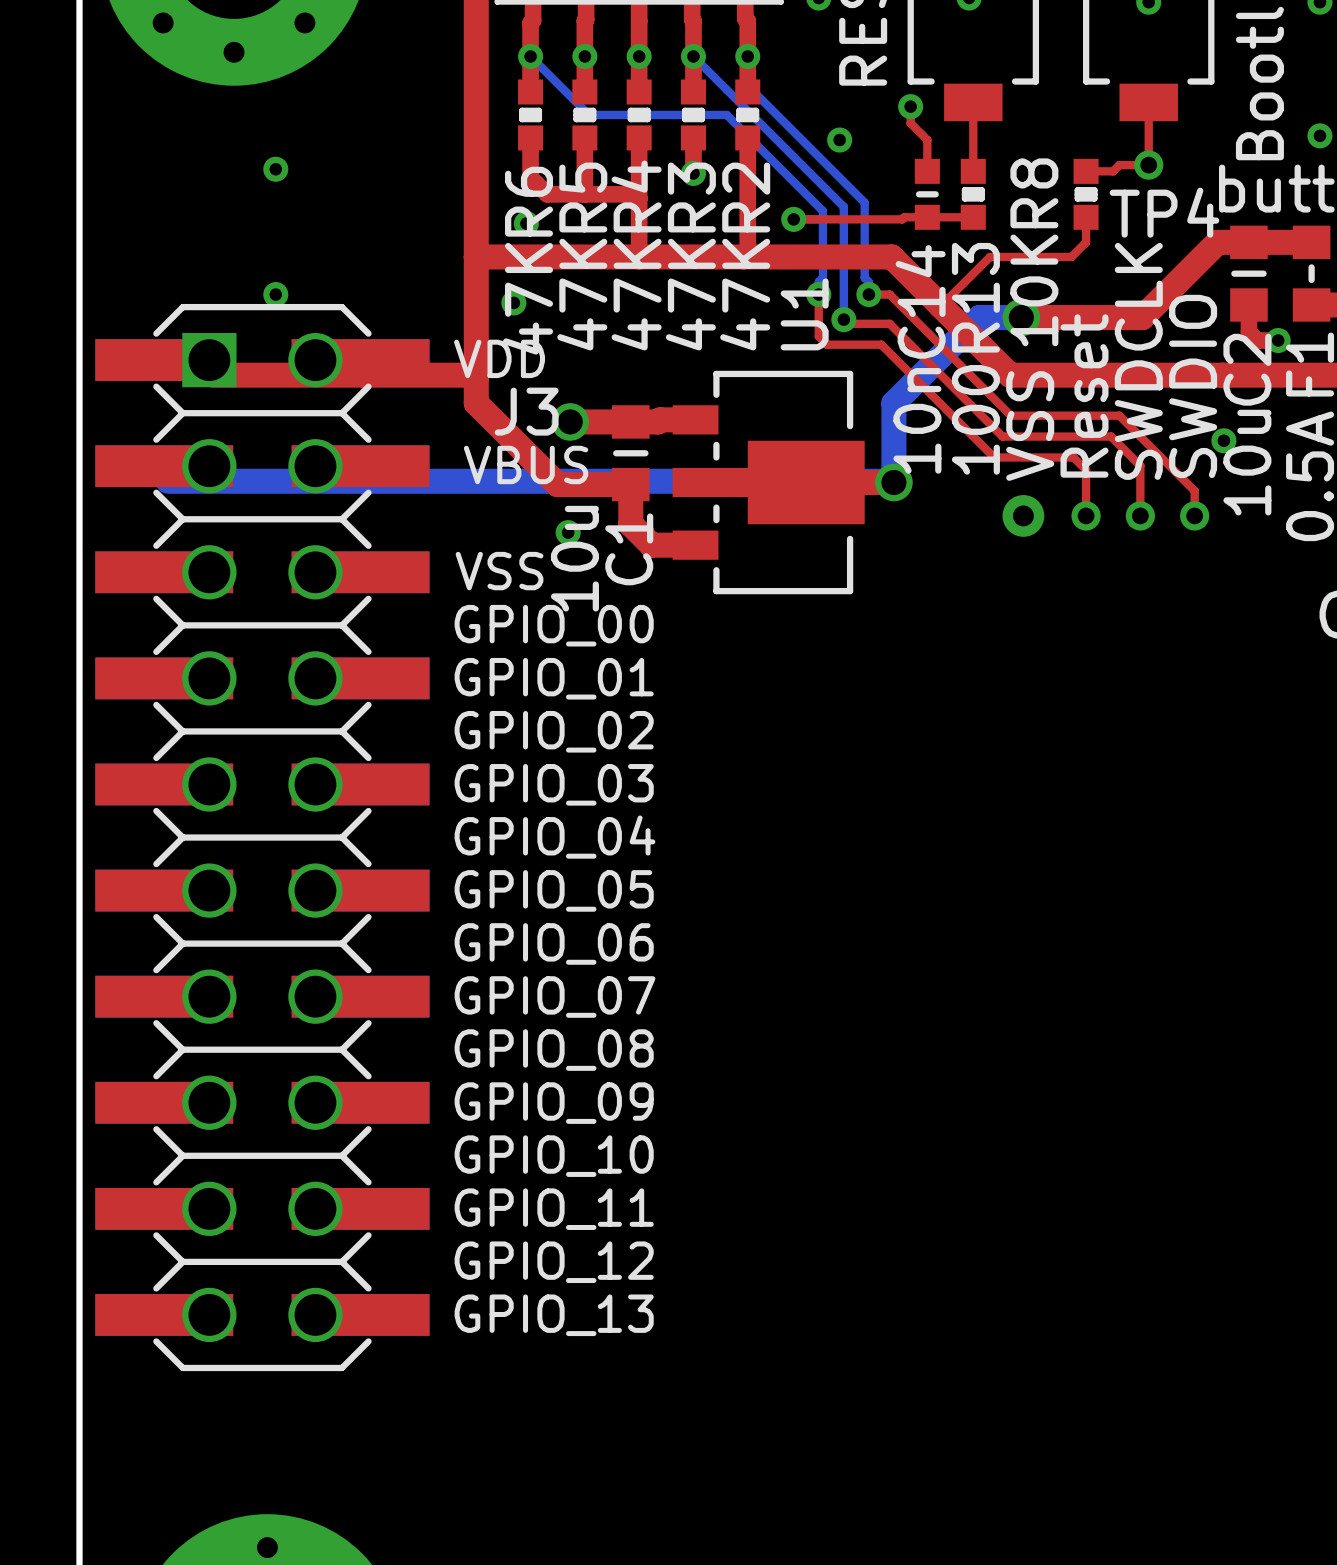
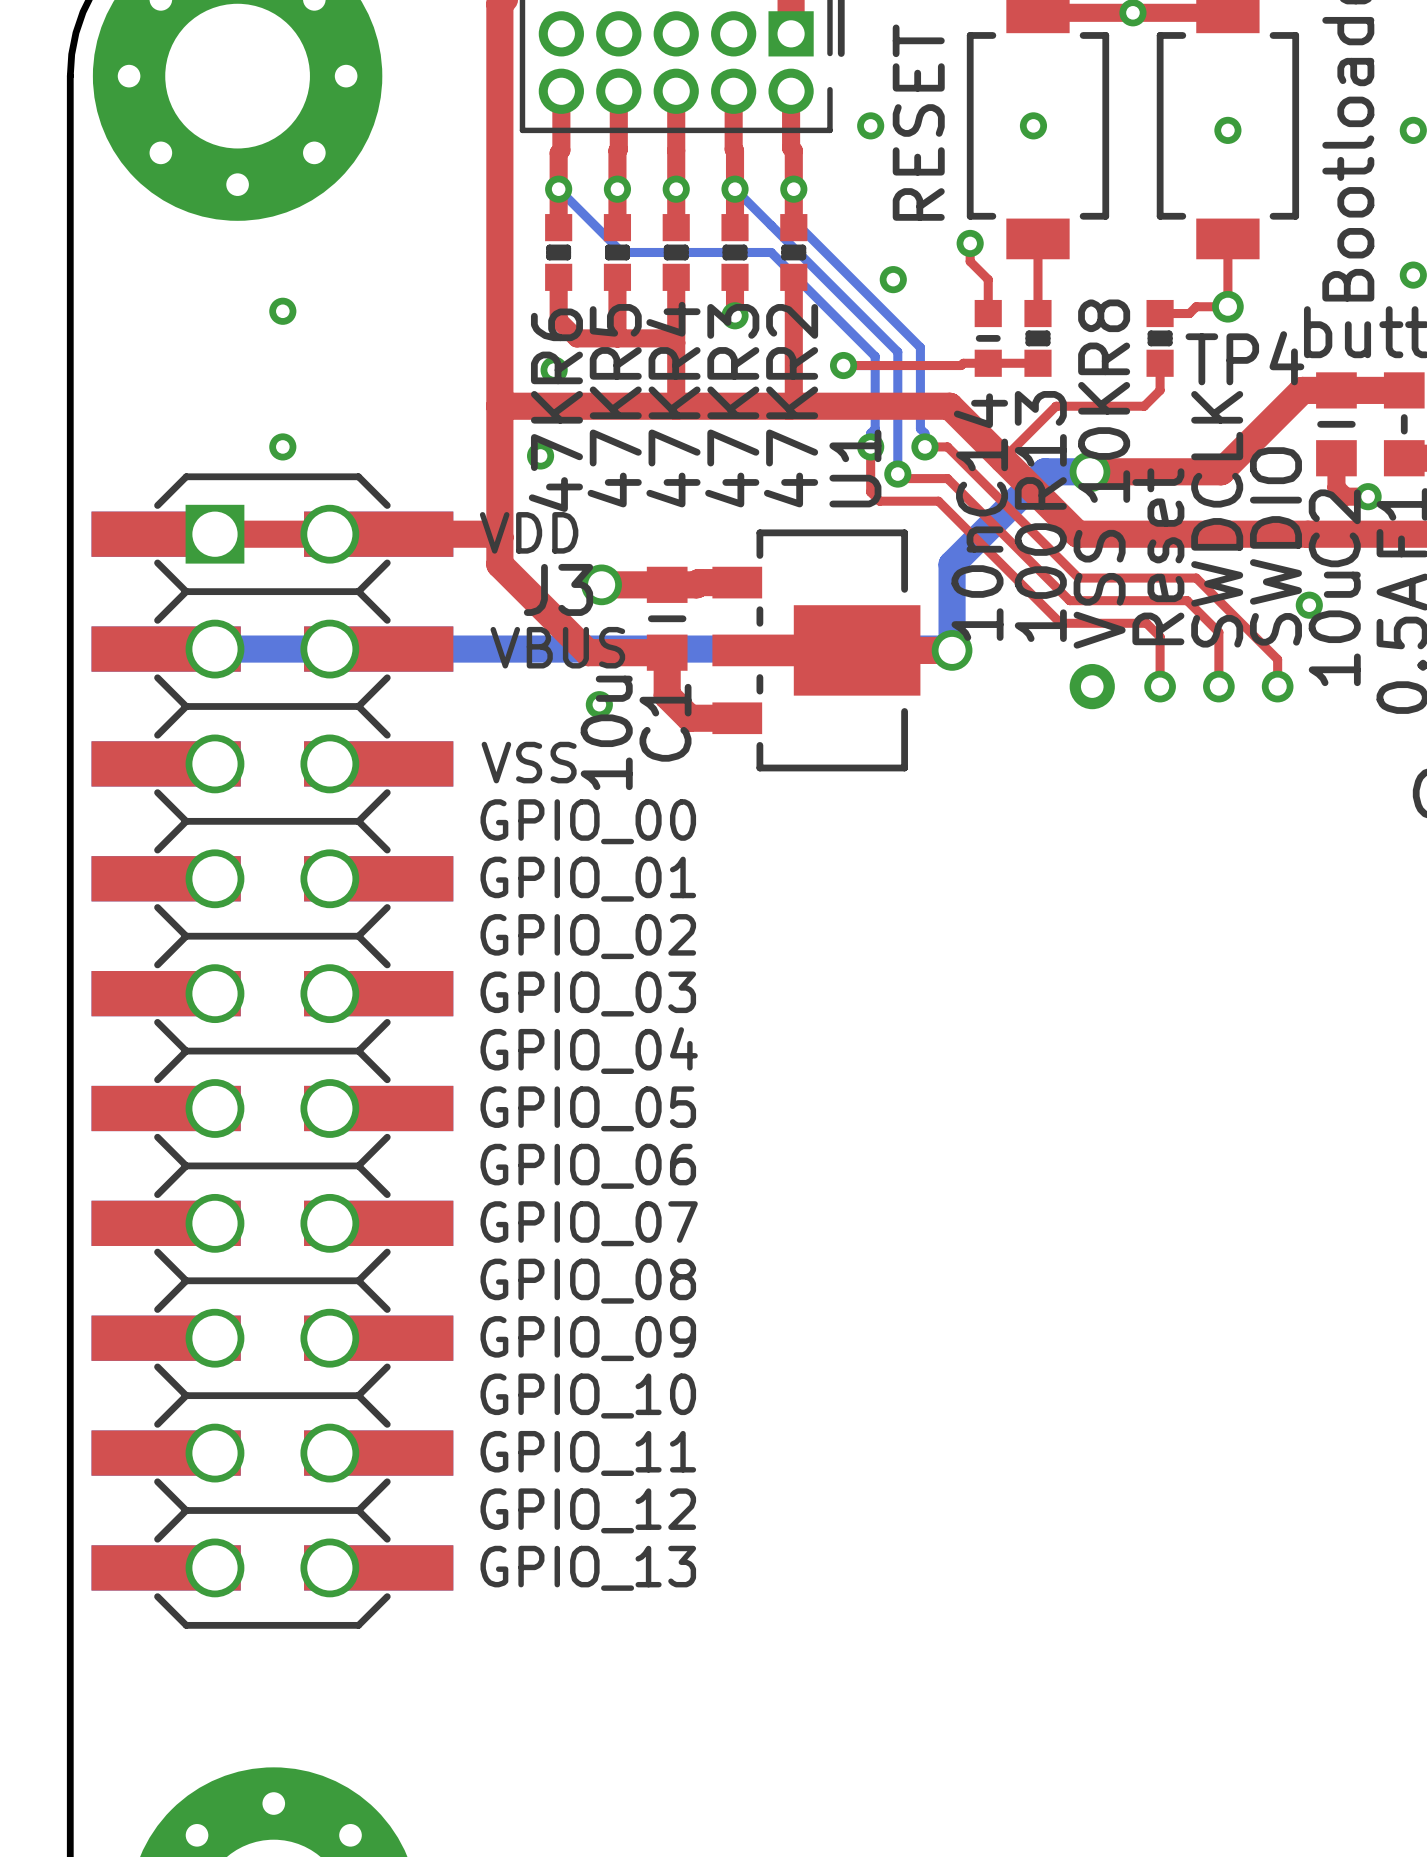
J3 position: (262, 837) -> (272, 1051)

